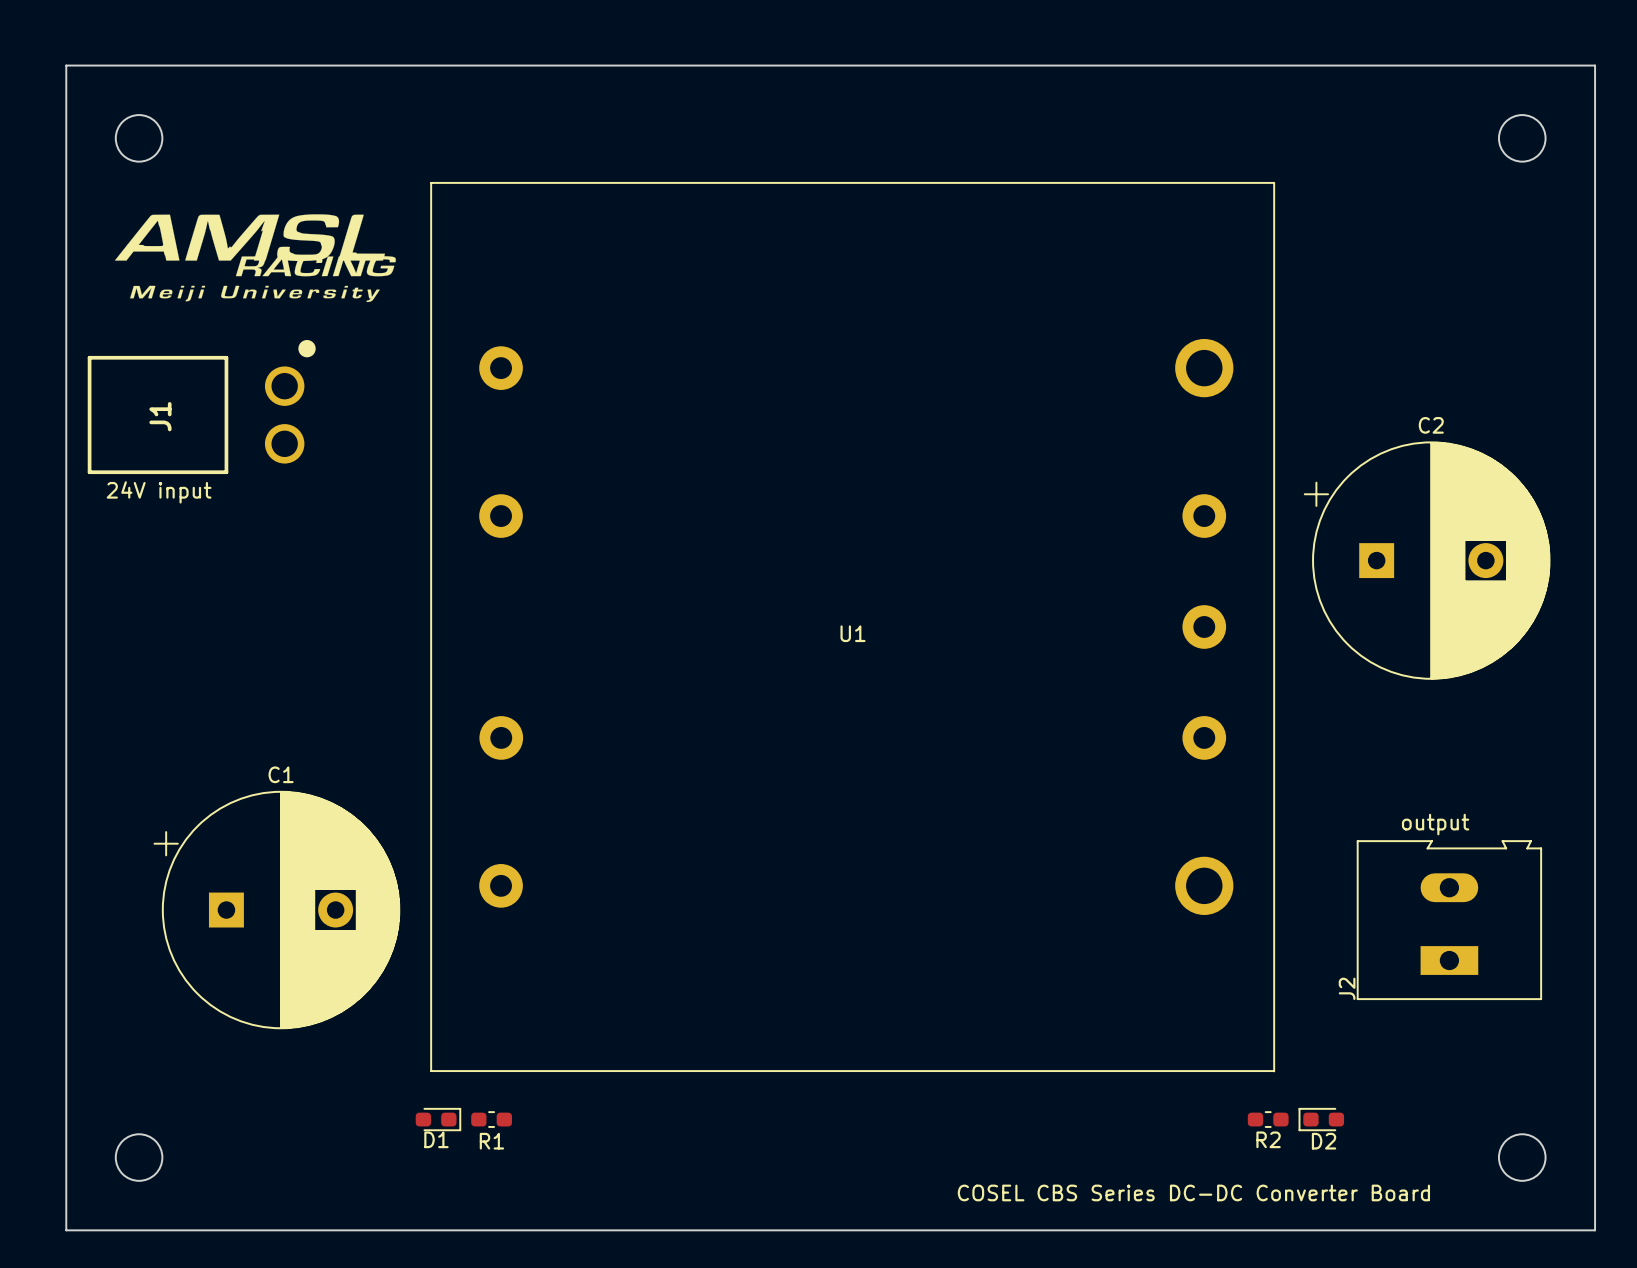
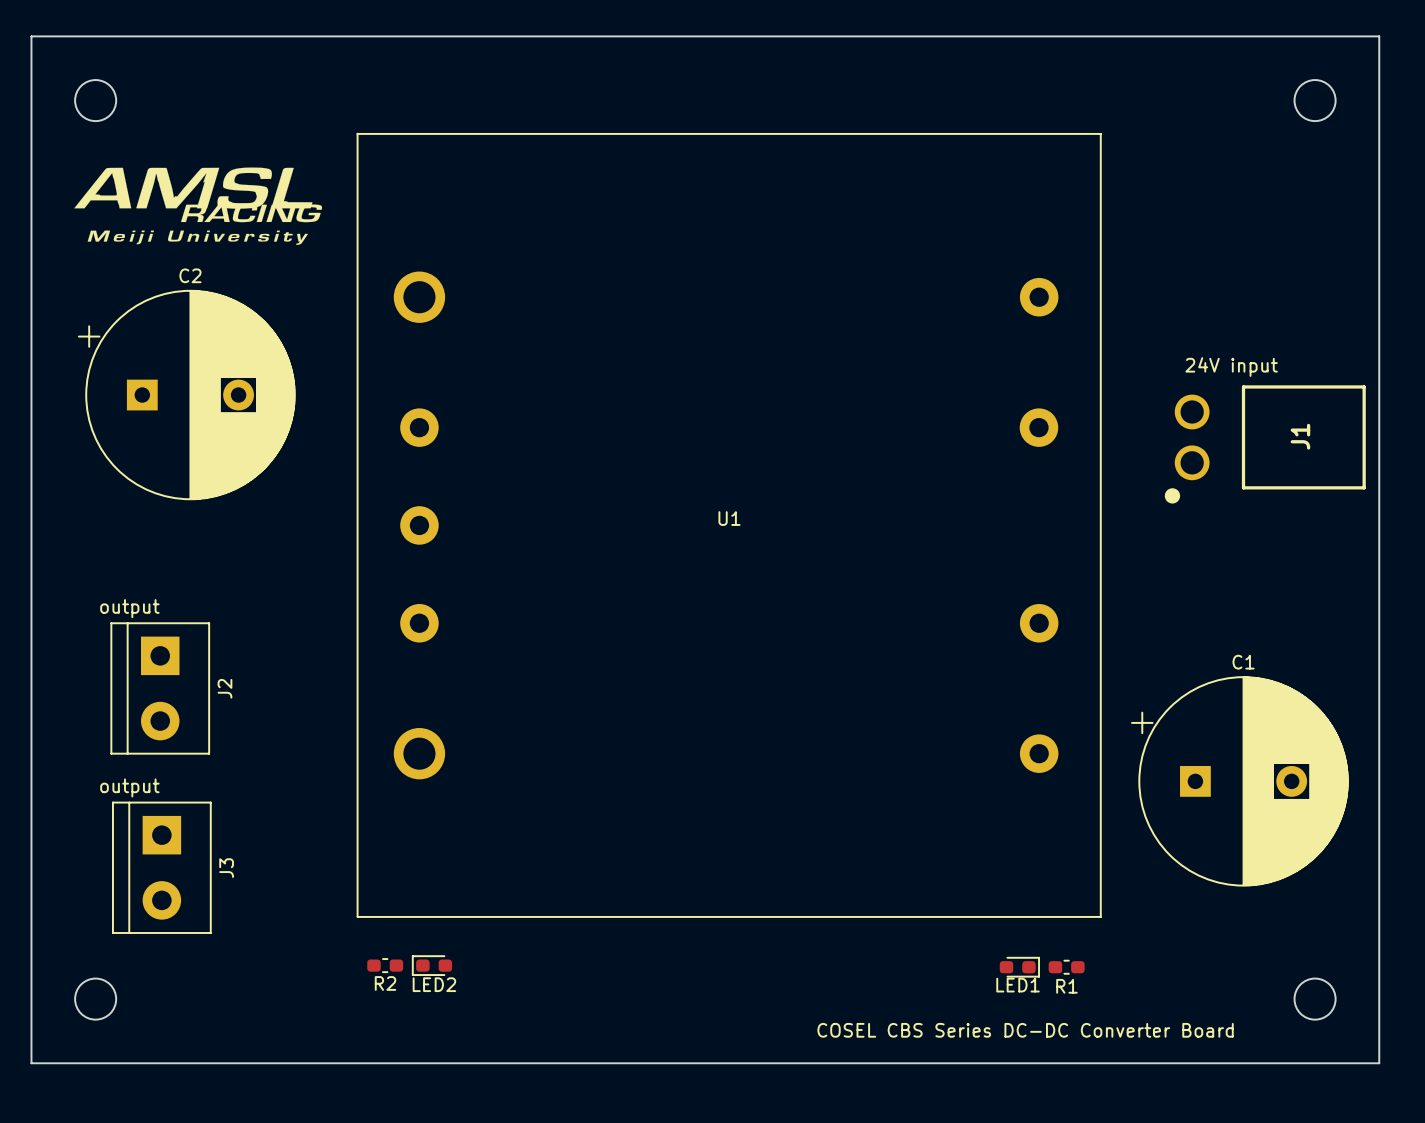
J1 rotation: 0° (201, 407) -> 180° (1265, 444)
J1 position: (201, 407) -> (1265, 444)
text: none -> 24V input (1231, 367)
text: 24V input (159, 492) -> none
C2 position: (1427, 560) -> (186, 395)
U1 rotation: 0° (852, 627) -> 180° (729, 525)
text: none -> output (129, 608)
text: output (1435, 824) -> none
J2 footprint: [1356, 840, 1543, 1000] -> [110, 622, 210, 755]
C1 position: (276, 910) -> (1239, 781)
text: none -> output (129, 787)
J2 name position: J2 (1347, 988) -> J2 (224, 688)
J3: none -> (161, 867)
D1: (438, 1119) -> none
R1 position: (491, 1119) -> (1066, 967)
LED2: none -> (432, 965)
R2 position: (1268, 1119) -> (385, 965)
D2: (1321, 1119) -> none
LED1: none -> (1019, 967)

